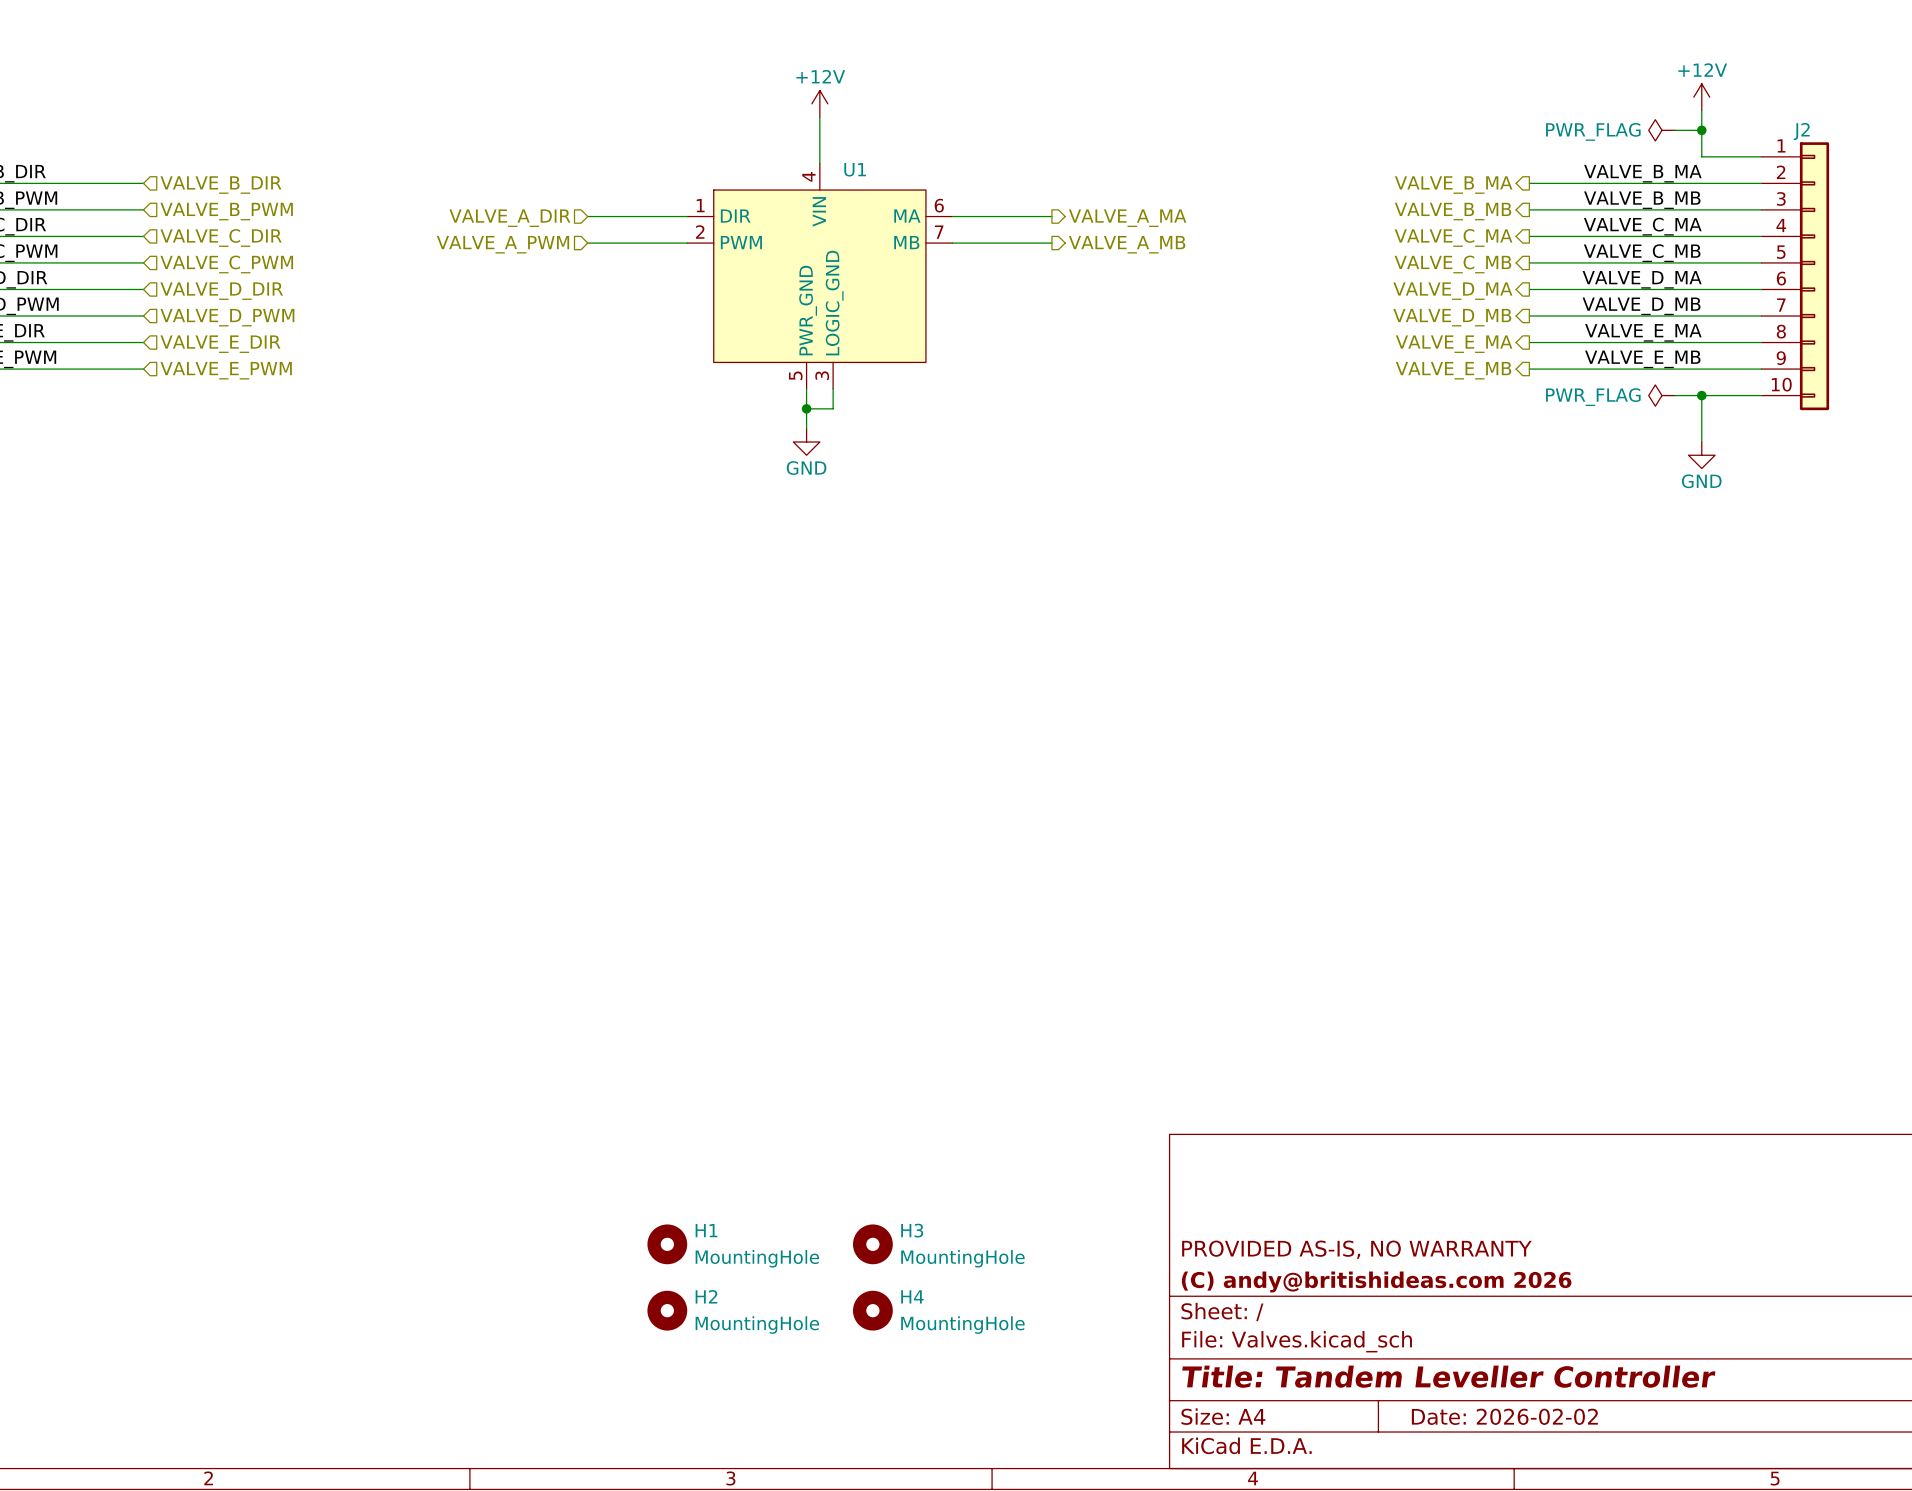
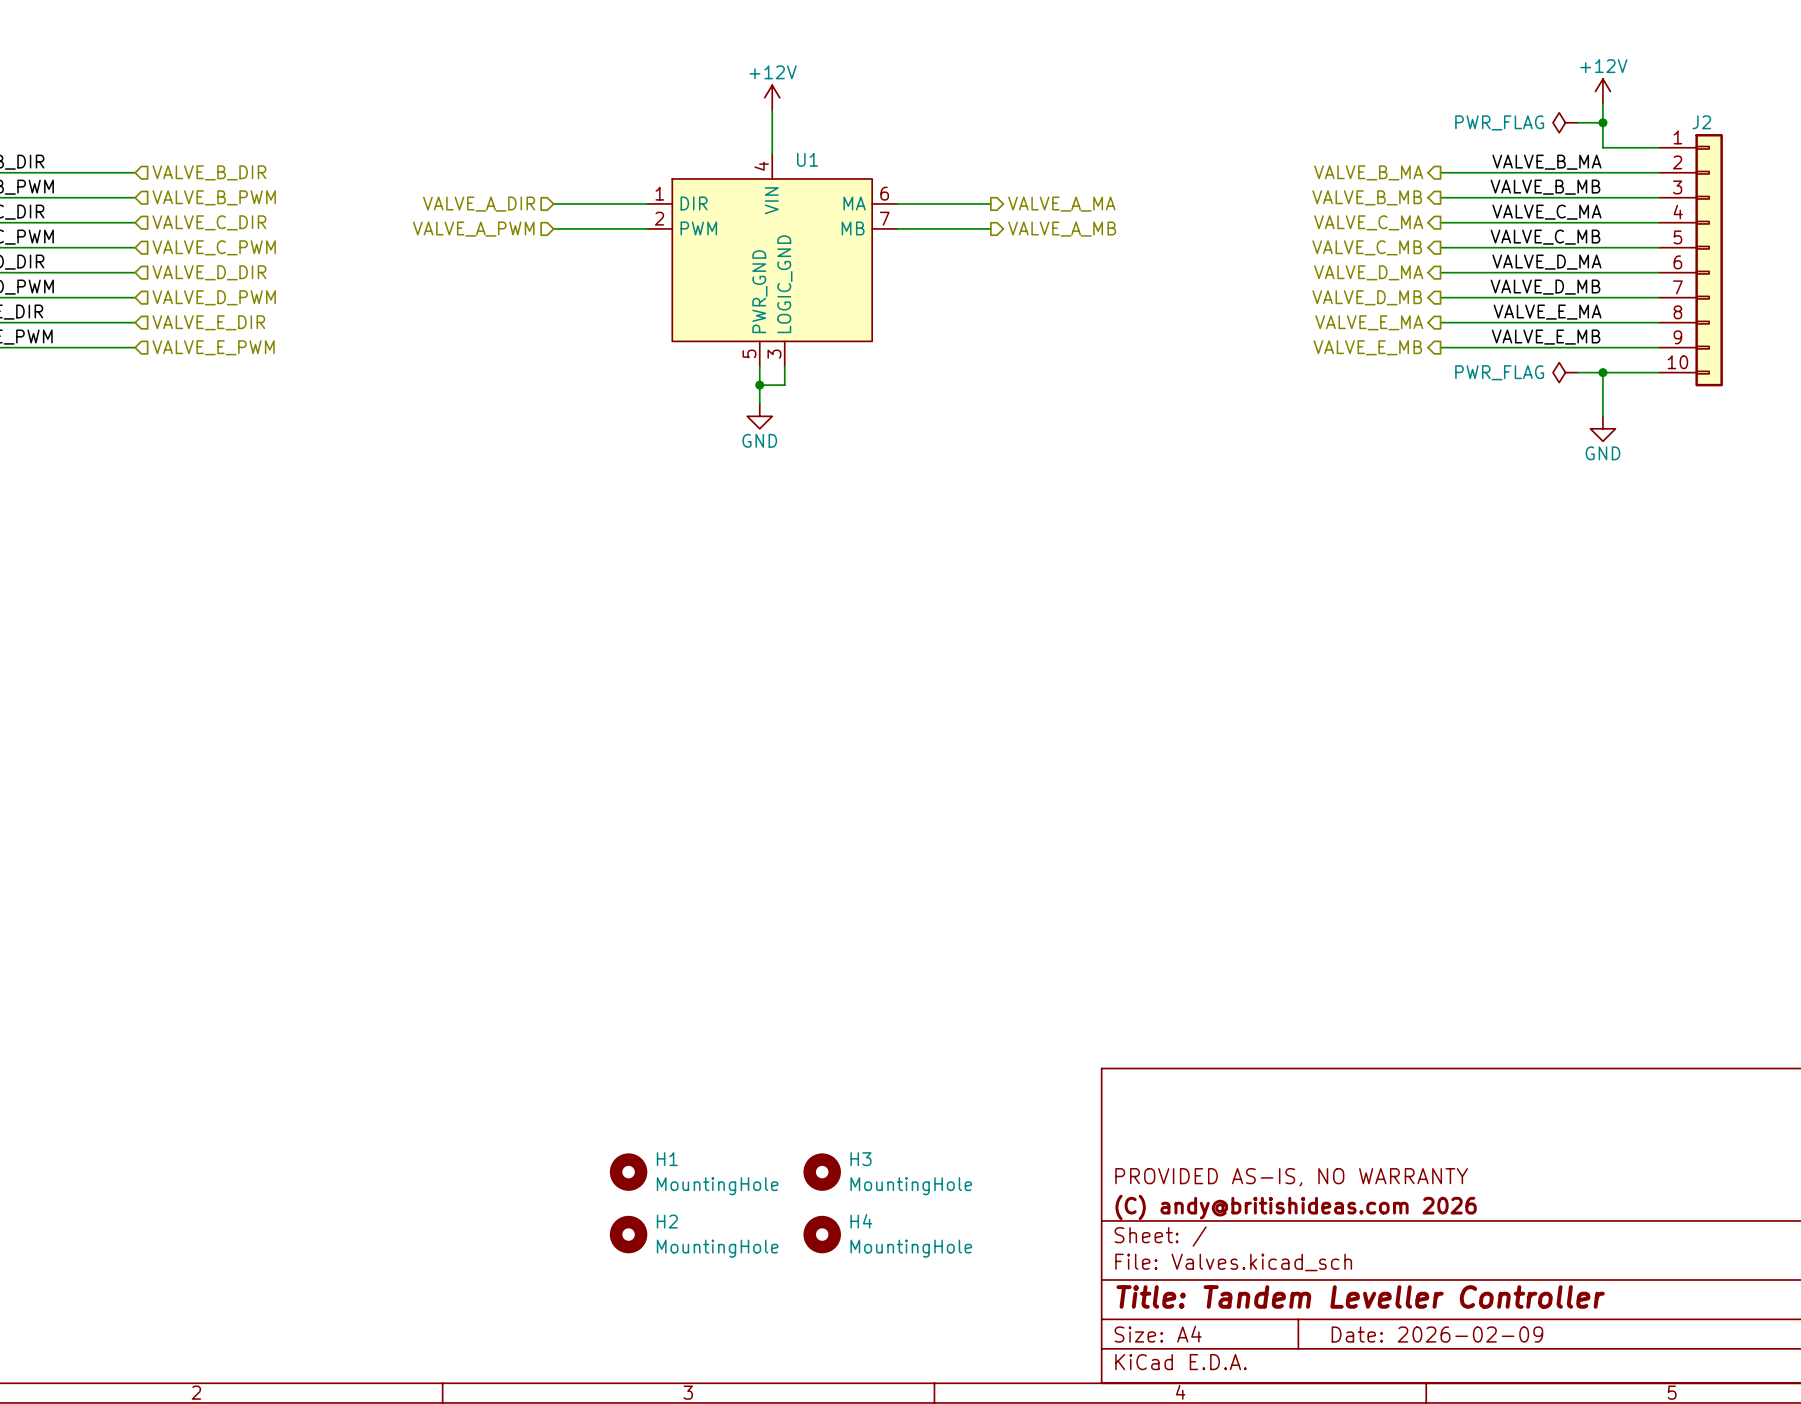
title block: Date: 2026-02-02 (1504, 1416) -> Date: 2026-02-09 (1437, 1334)

